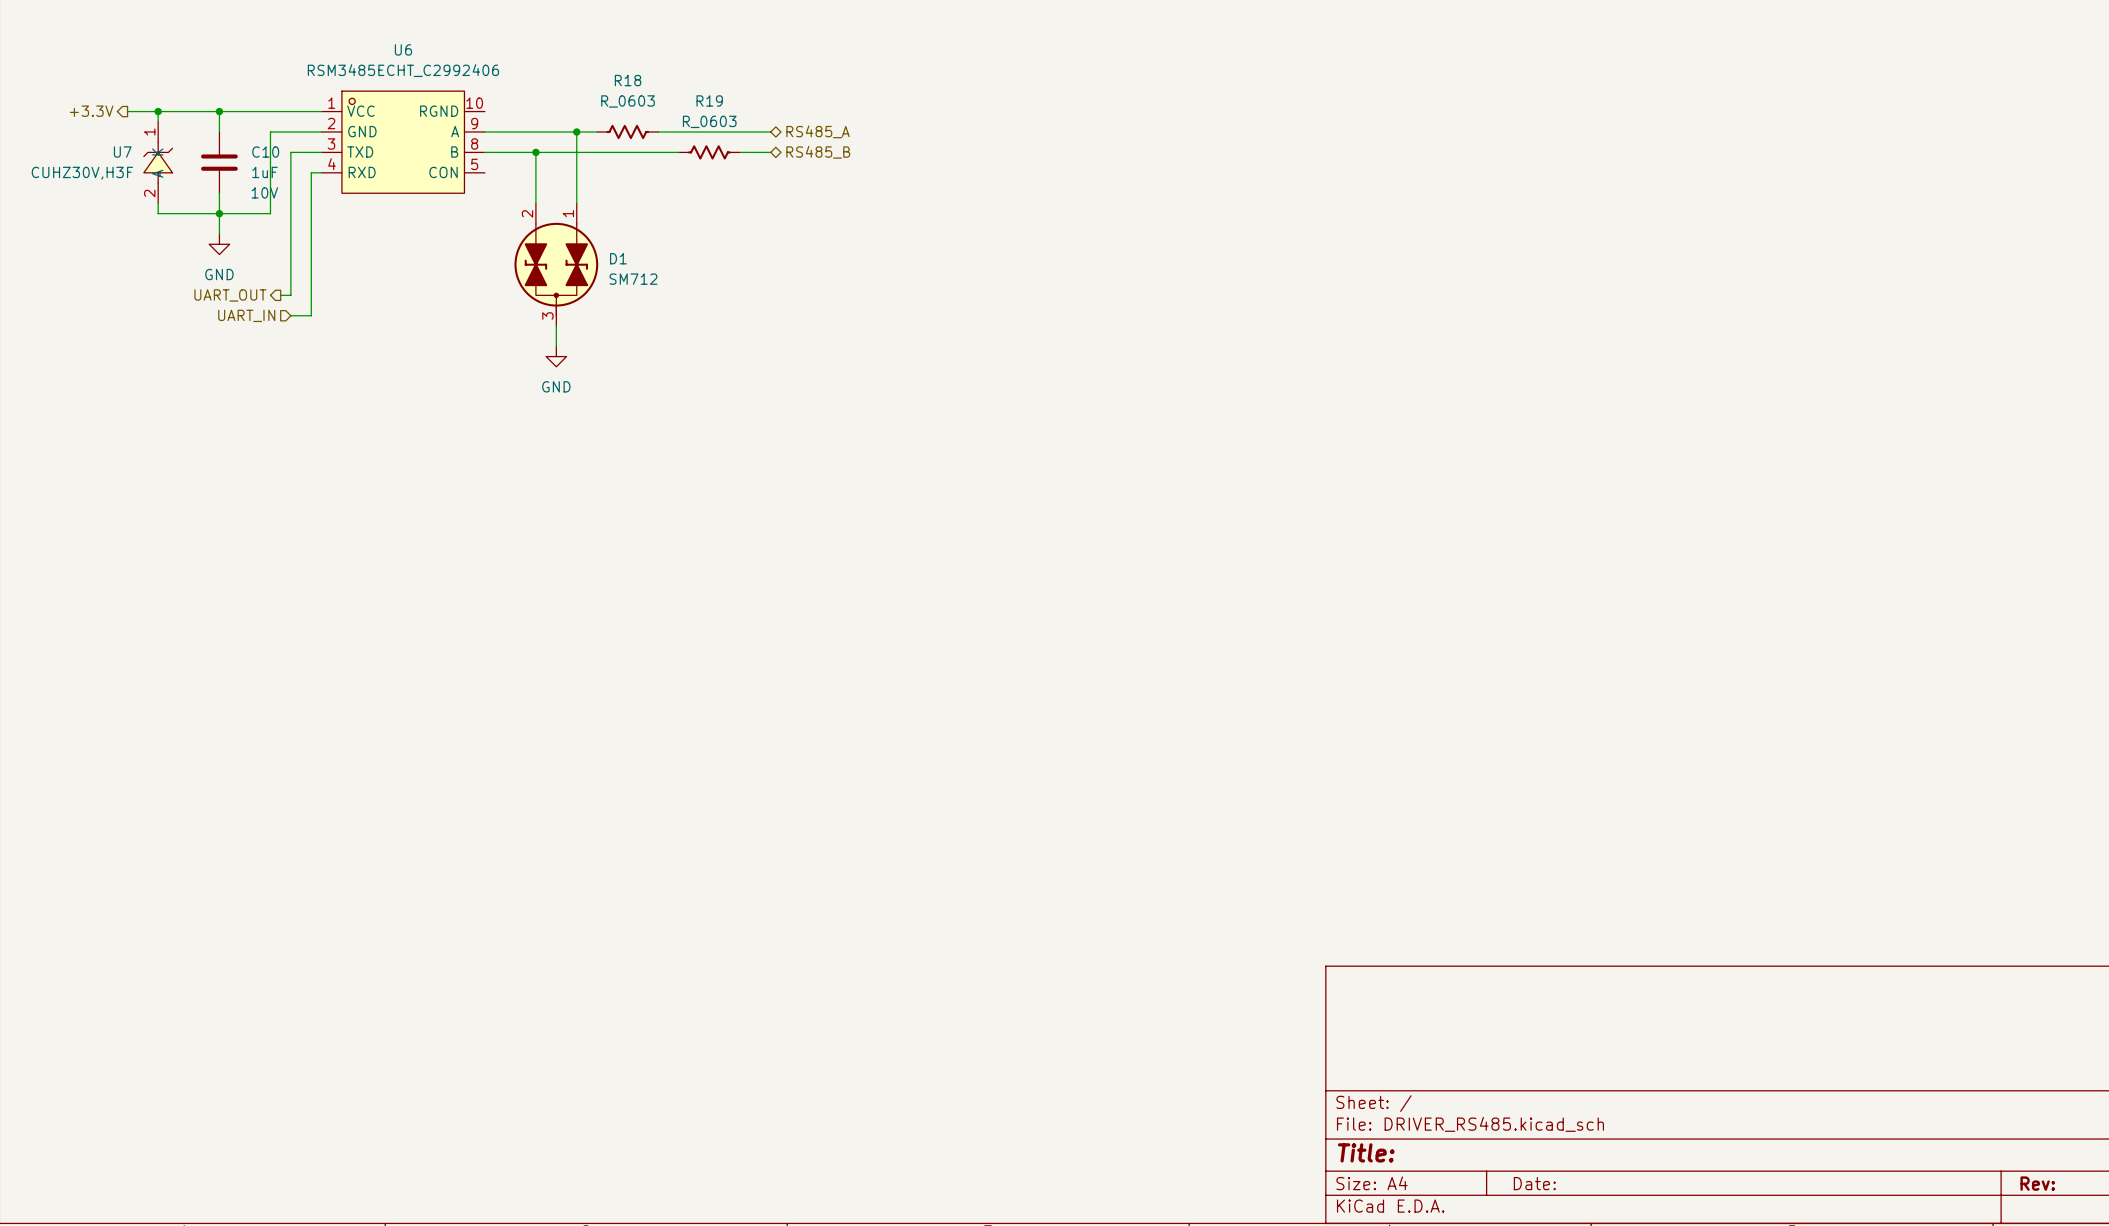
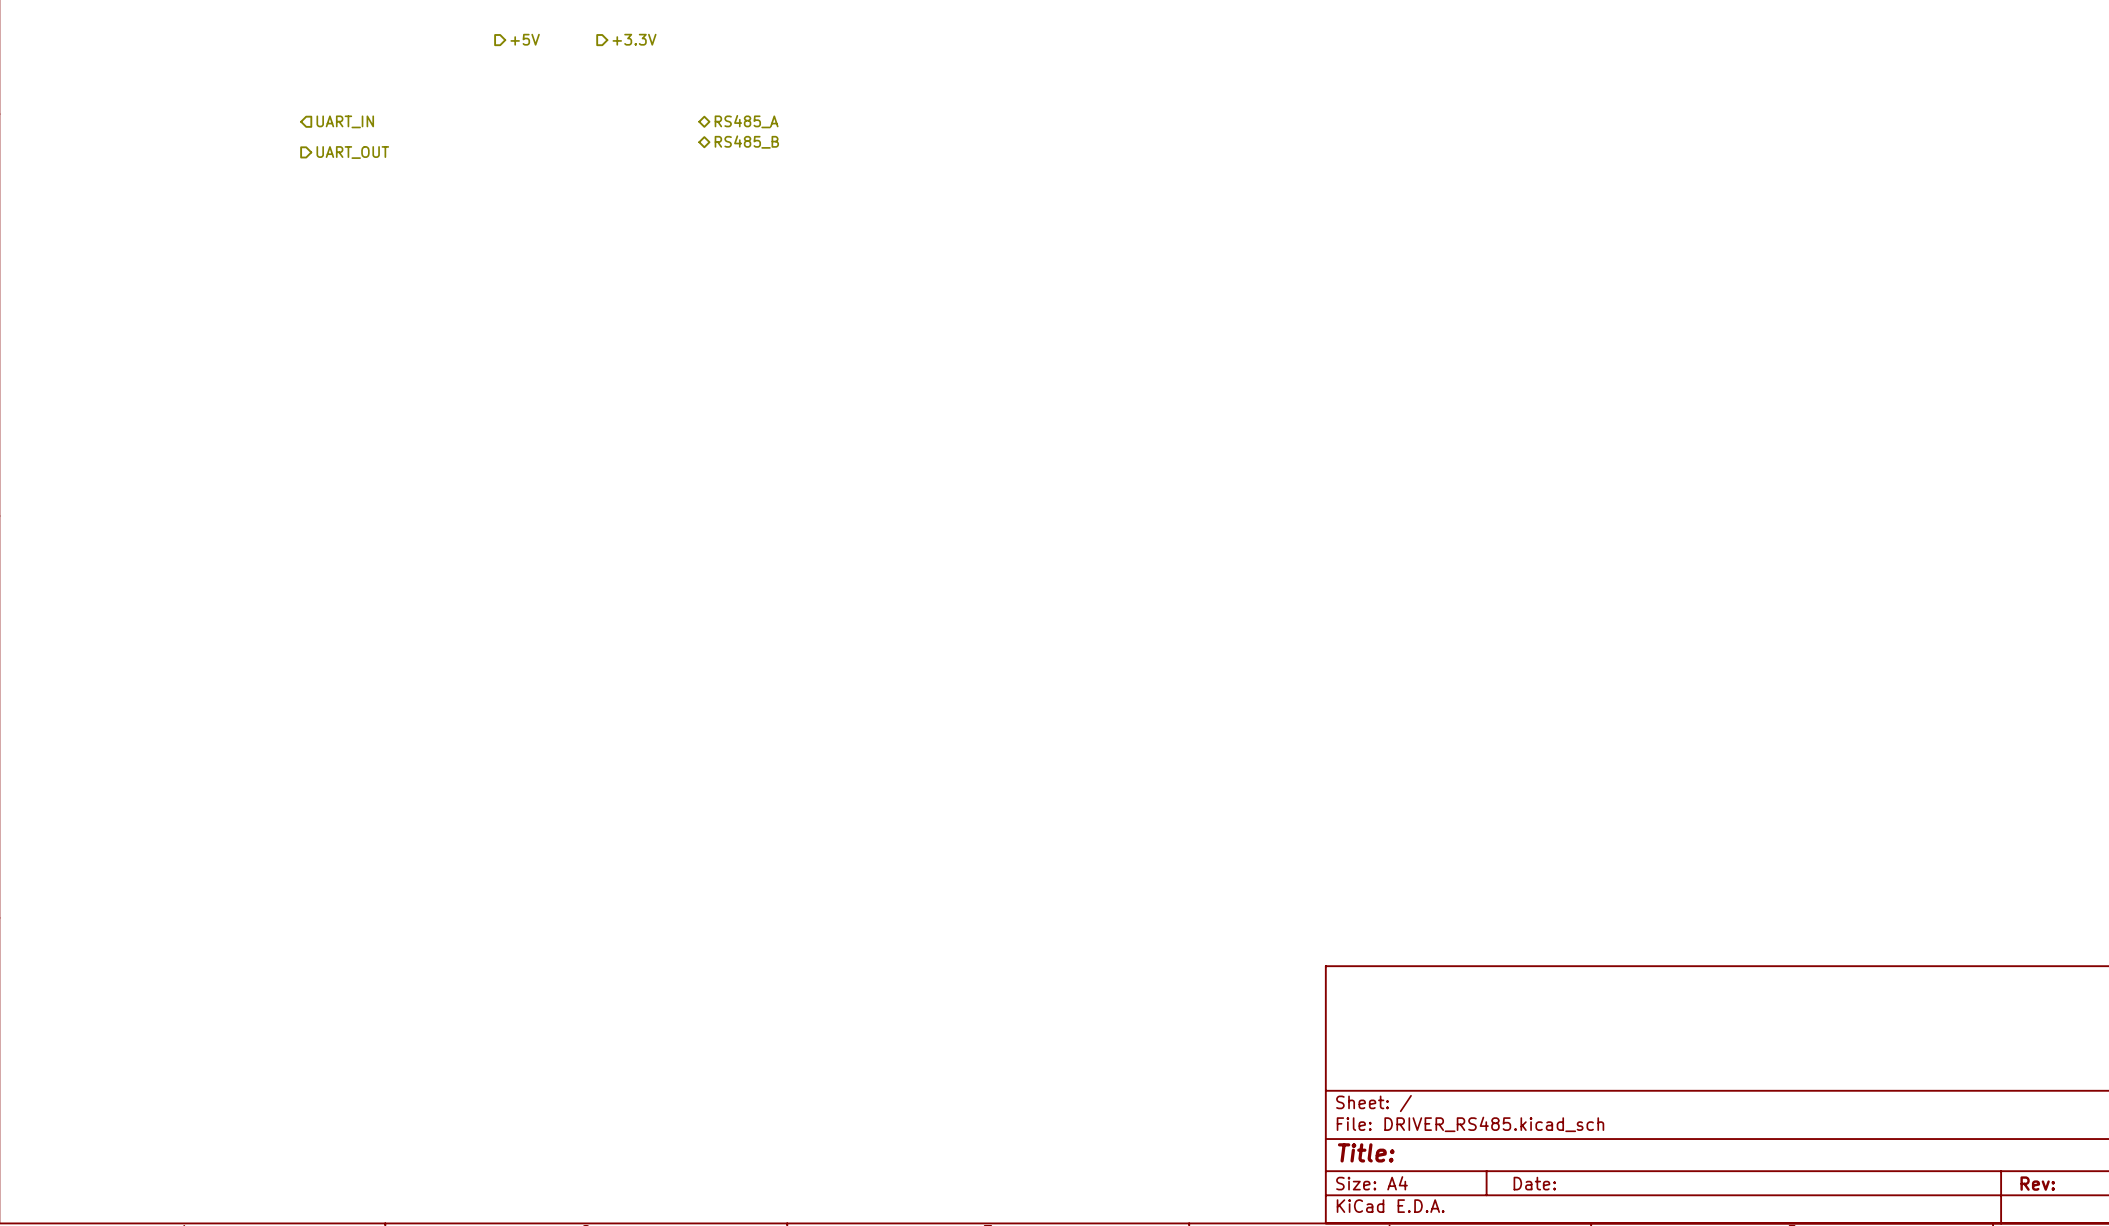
hierarchical label: none -> +5V (525, 39)
hierarchical label: none -> +3.3V (634, 39)
hierarchical label: +3.3V (91, 111) -> none
wire: (127, 111) (321, 111) -> none
wire: (158, 111) (158, 121) -> none
junction: (158, 111) -> none
wire: (219, 111) (219, 131) -> none
junction: (219, 111) -> none
wire: (321, 131) (270, 131) (270, 213) (158, 213) (158, 203) -> none
wire: (484, 131) (597, 131) -> none
wire: (576, 131) (576, 203) -> none
junction: (576, 131) -> none
R18: R_0603 (627, 131) -> none
wire: (658, 131) (770, 131) -> none
hierarchical label position: RS485_A (818, 131) -> RS485_A (746, 121)
U6: RSM3485ECHT_C2992406 (403, 142) -> none
wire: (321, 152) (290, 152) (290, 295) (280, 295) -> none
wire: (484, 152) (678, 152) -> none
wire: (535, 152) (535, 203) -> none
junction: (535, 152) -> none
R19: R_0603 (709, 152) -> none
wire: (740, 152) (770, 152) -> none
hierarchical label position: RS485_B (818, 152) -> RS485_B (746, 142)
U7: CUHZ30V,H3F (158, 162) -> none
C10: 1uF (219, 162) -> none
wire: (321, 172) (311, 172) (311, 315) (290, 315) -> none
wire: (219, 193) (219, 234) -> none
junction: (219, 213) -> none
power symbol: GND (219, 244) -> none
D1: SM712 (556, 264) -> none
hierarchical label rotation: 0° (230, 295) -> 180° (352, 152)
hierarchical label position: UART_OUT (230, 295) -> UART_OUT (352, 152)
hierarchical label rotation: 0° (246, 315) -> 180° (345, 121)
hierarchical label position: UART_IN (246, 315) -> UART_IN (345, 121)
wire: (556, 325) (556, 346) -> none
power symbol: GND (556, 356) -> none

